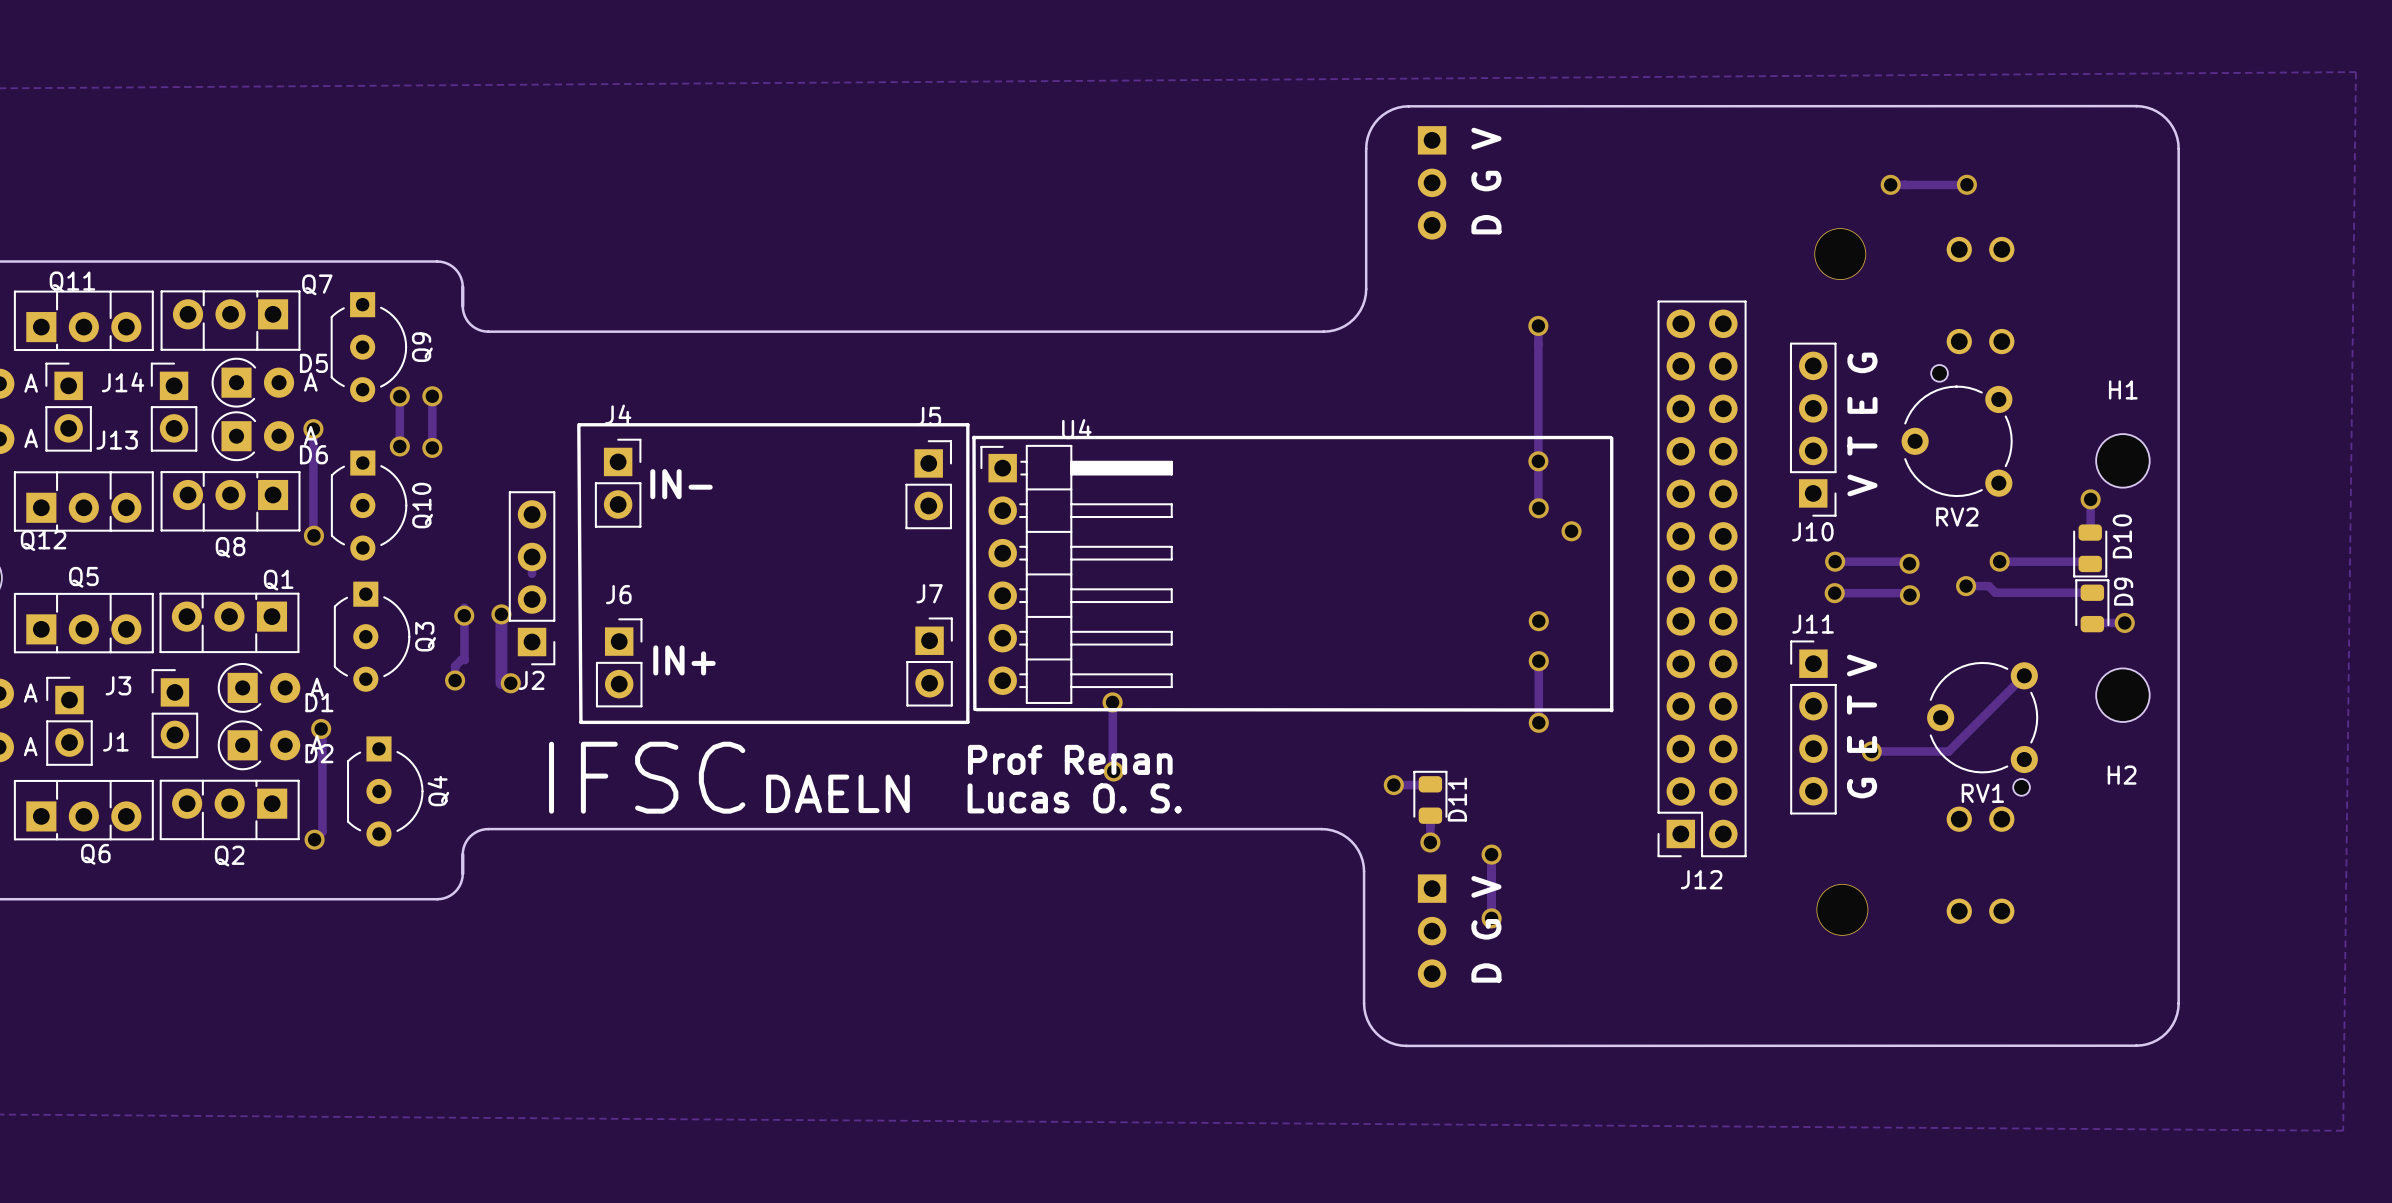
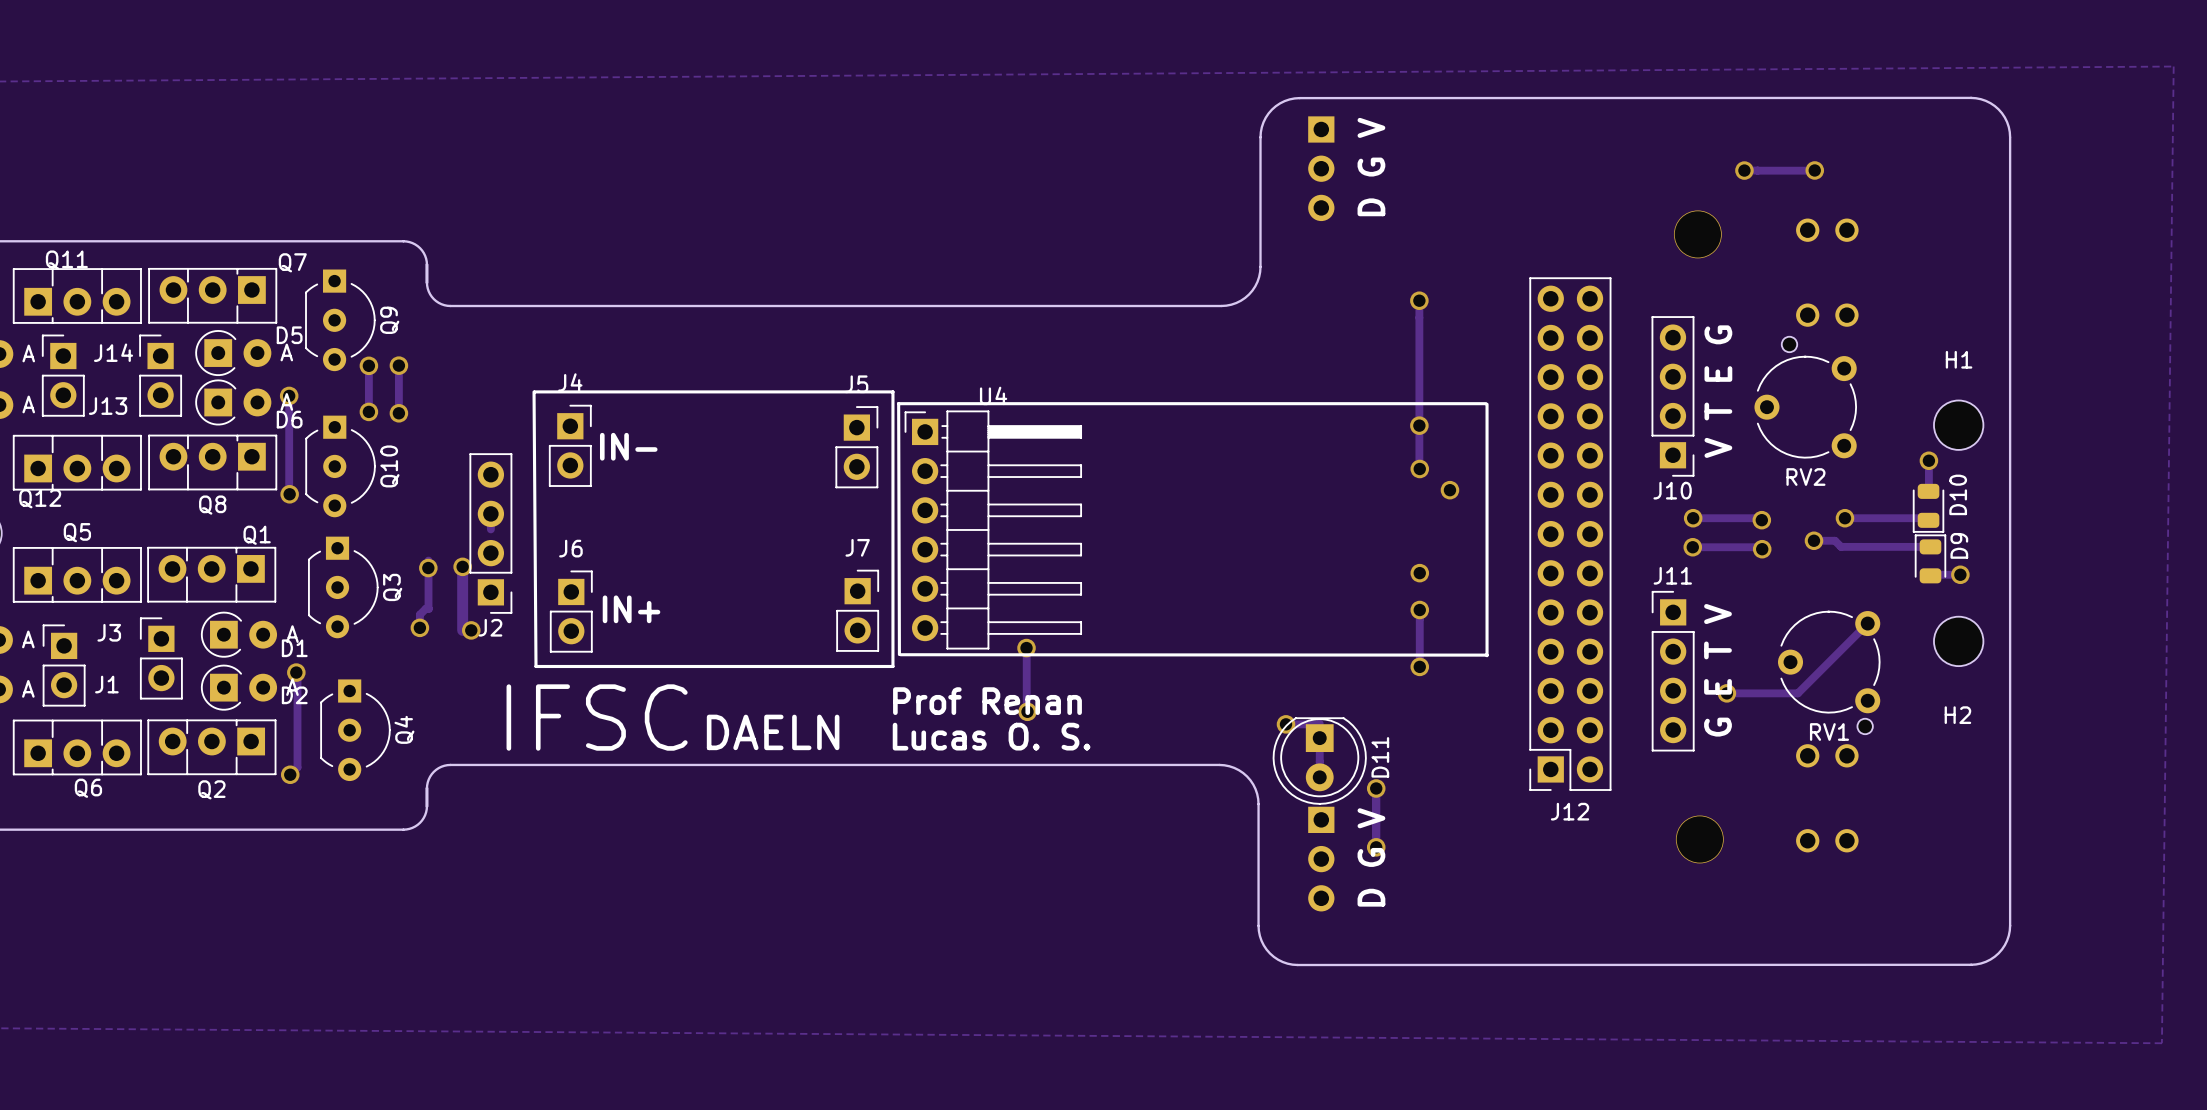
D11 footprint: [1413, 770, 1448, 824] -> [1272, 717, 1367, 805]
D11 name position: D11 (1457, 799) -> D11 (1380, 757)

